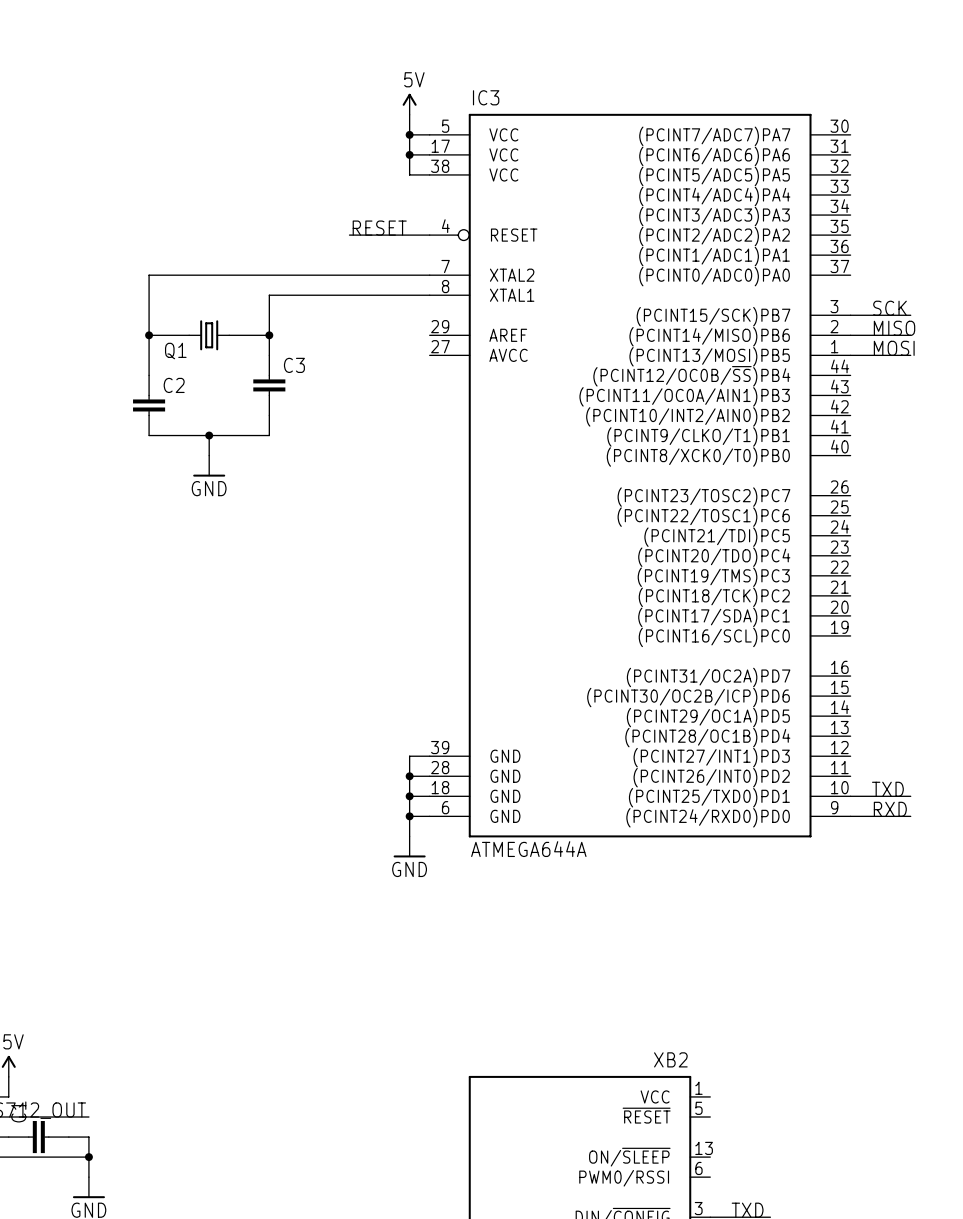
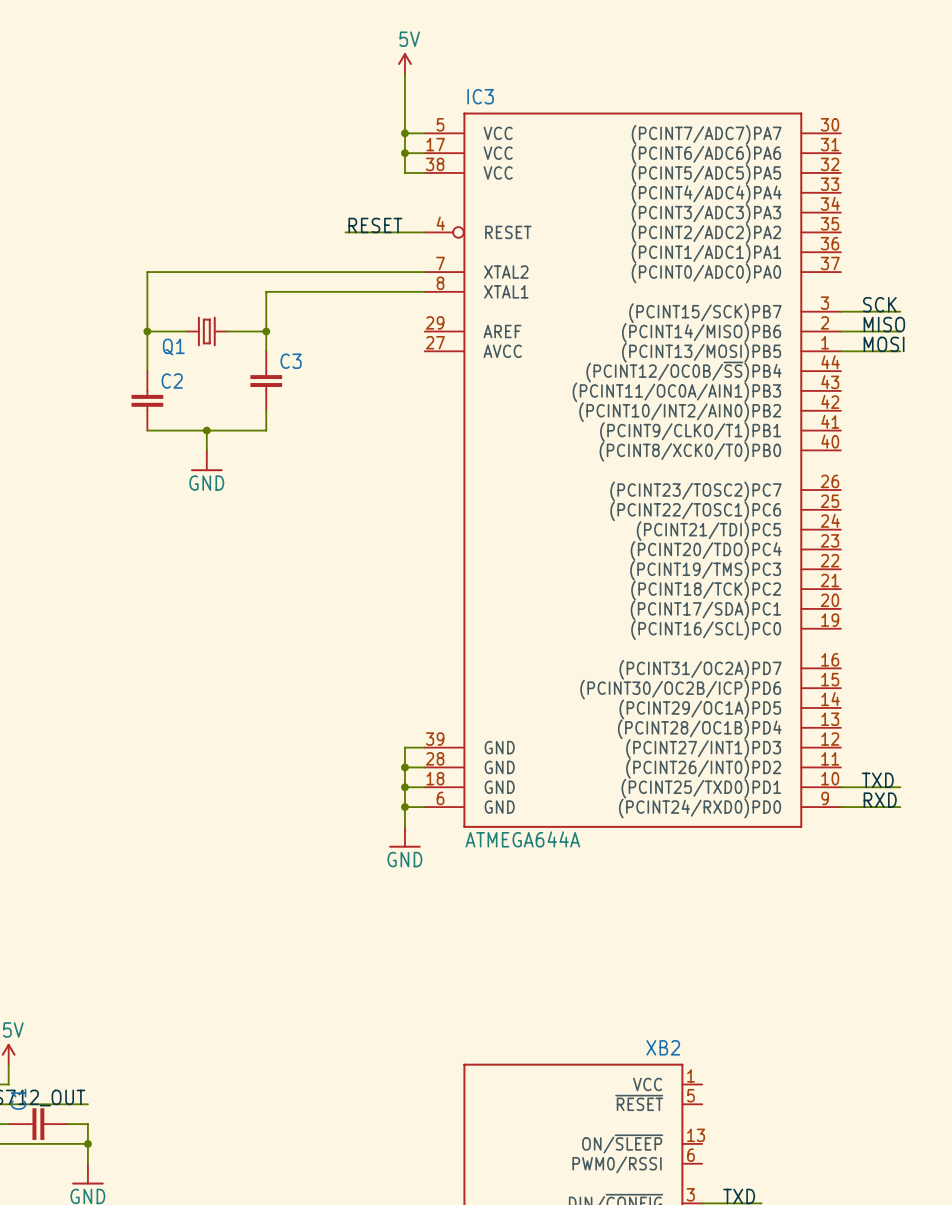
power symbol position: 5V (409, 104) -> 5V (404, 63)

